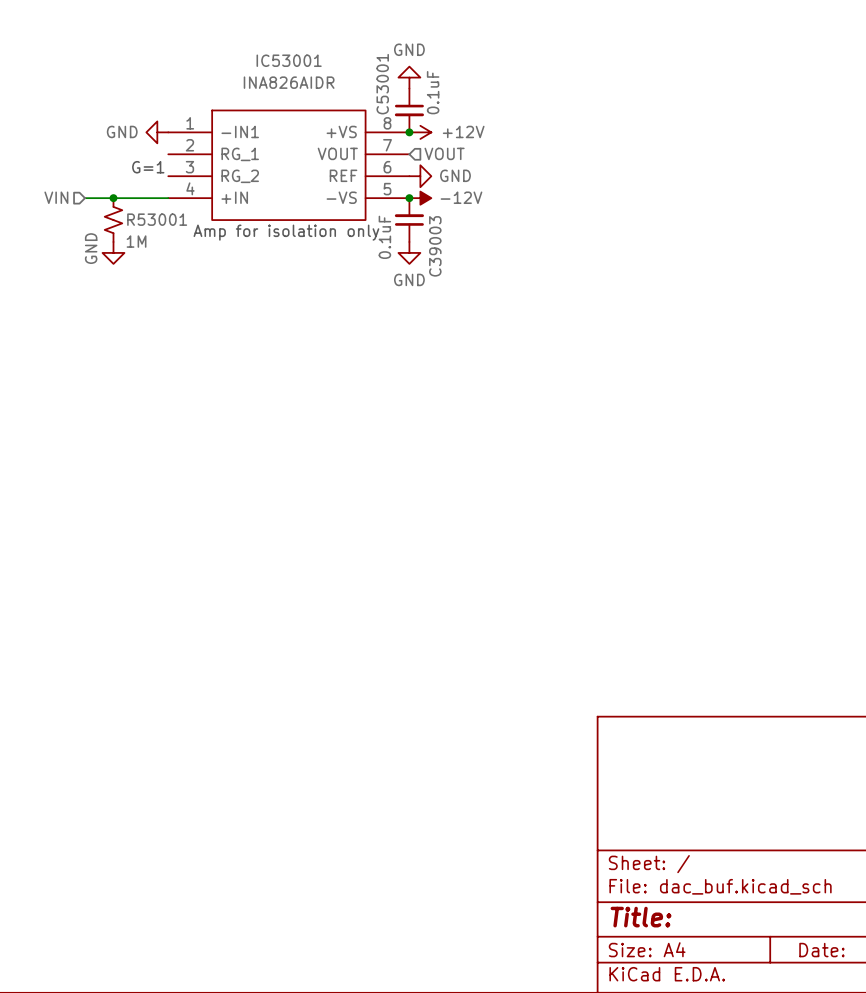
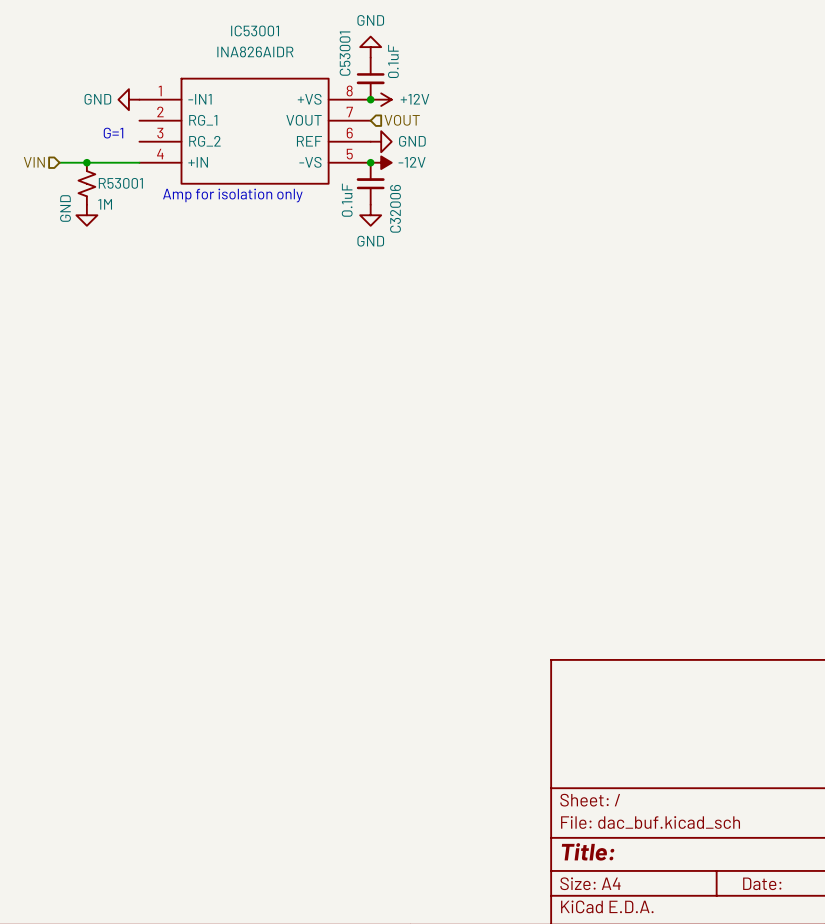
C39003 name: C39003 (435, 246) -> C32006 (395, 208)

